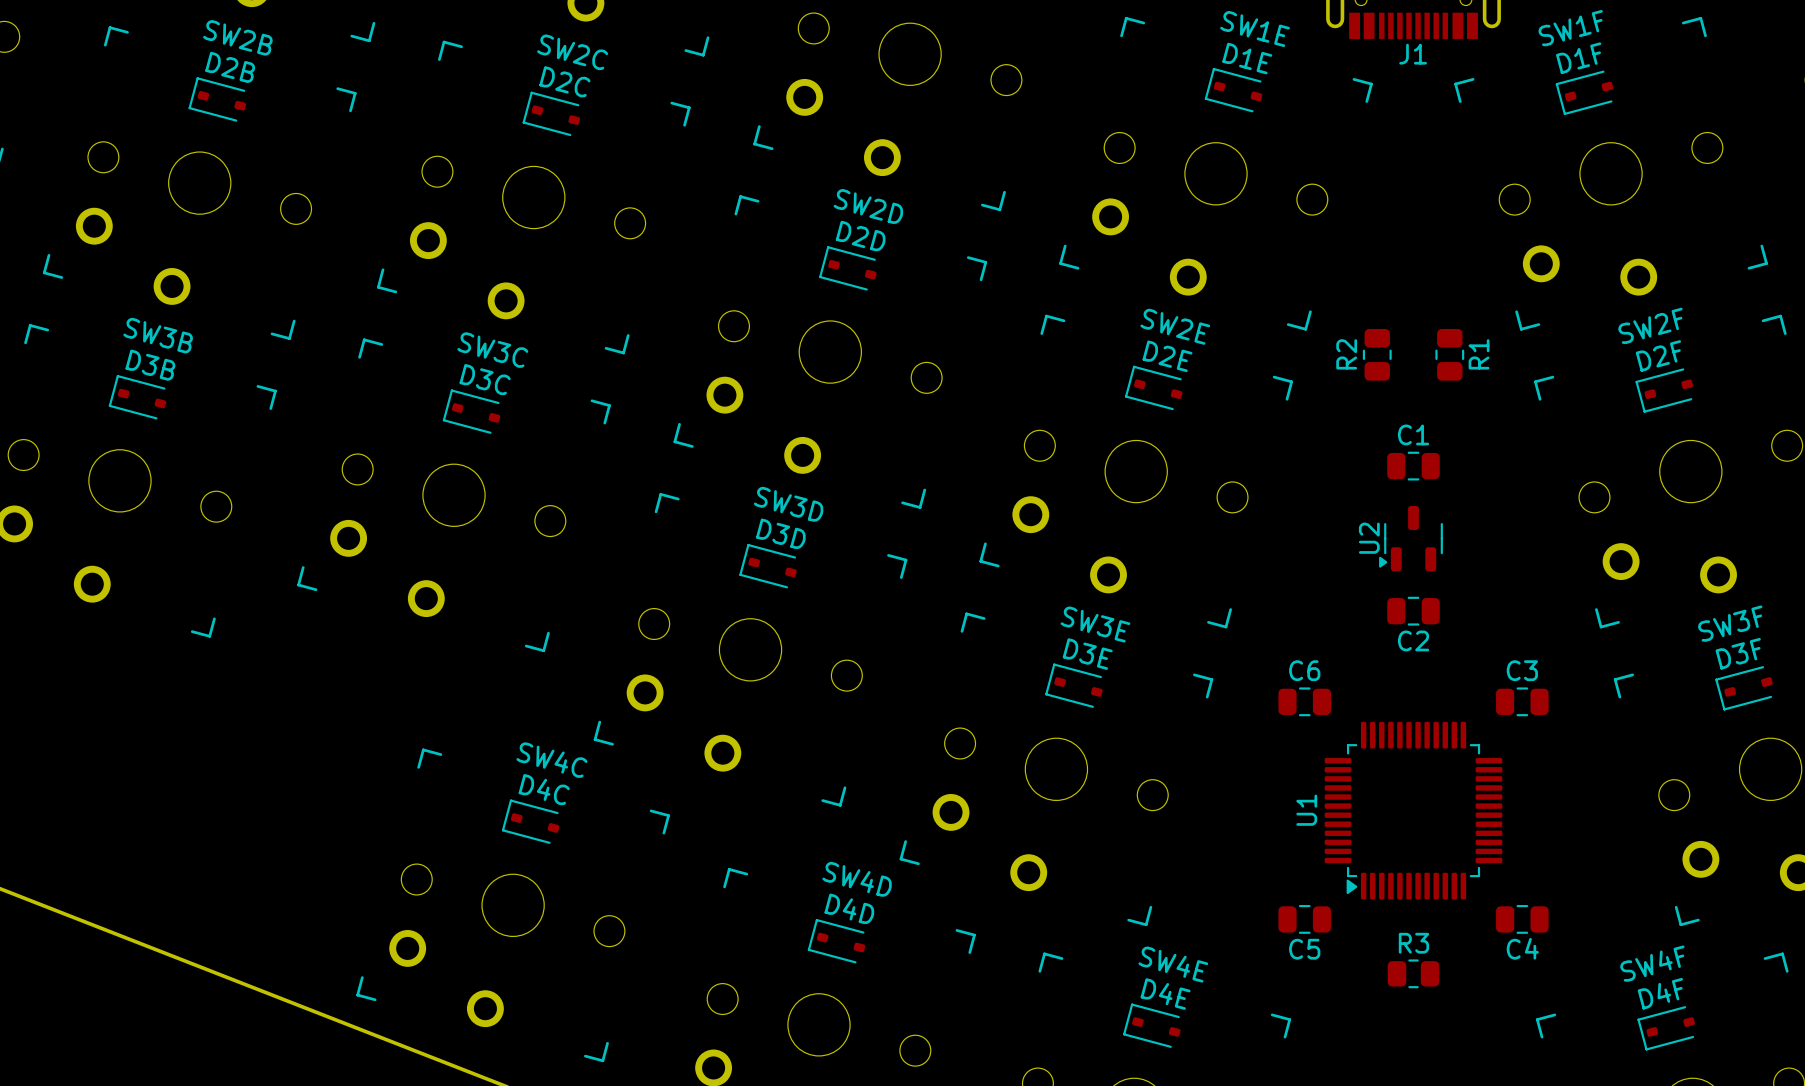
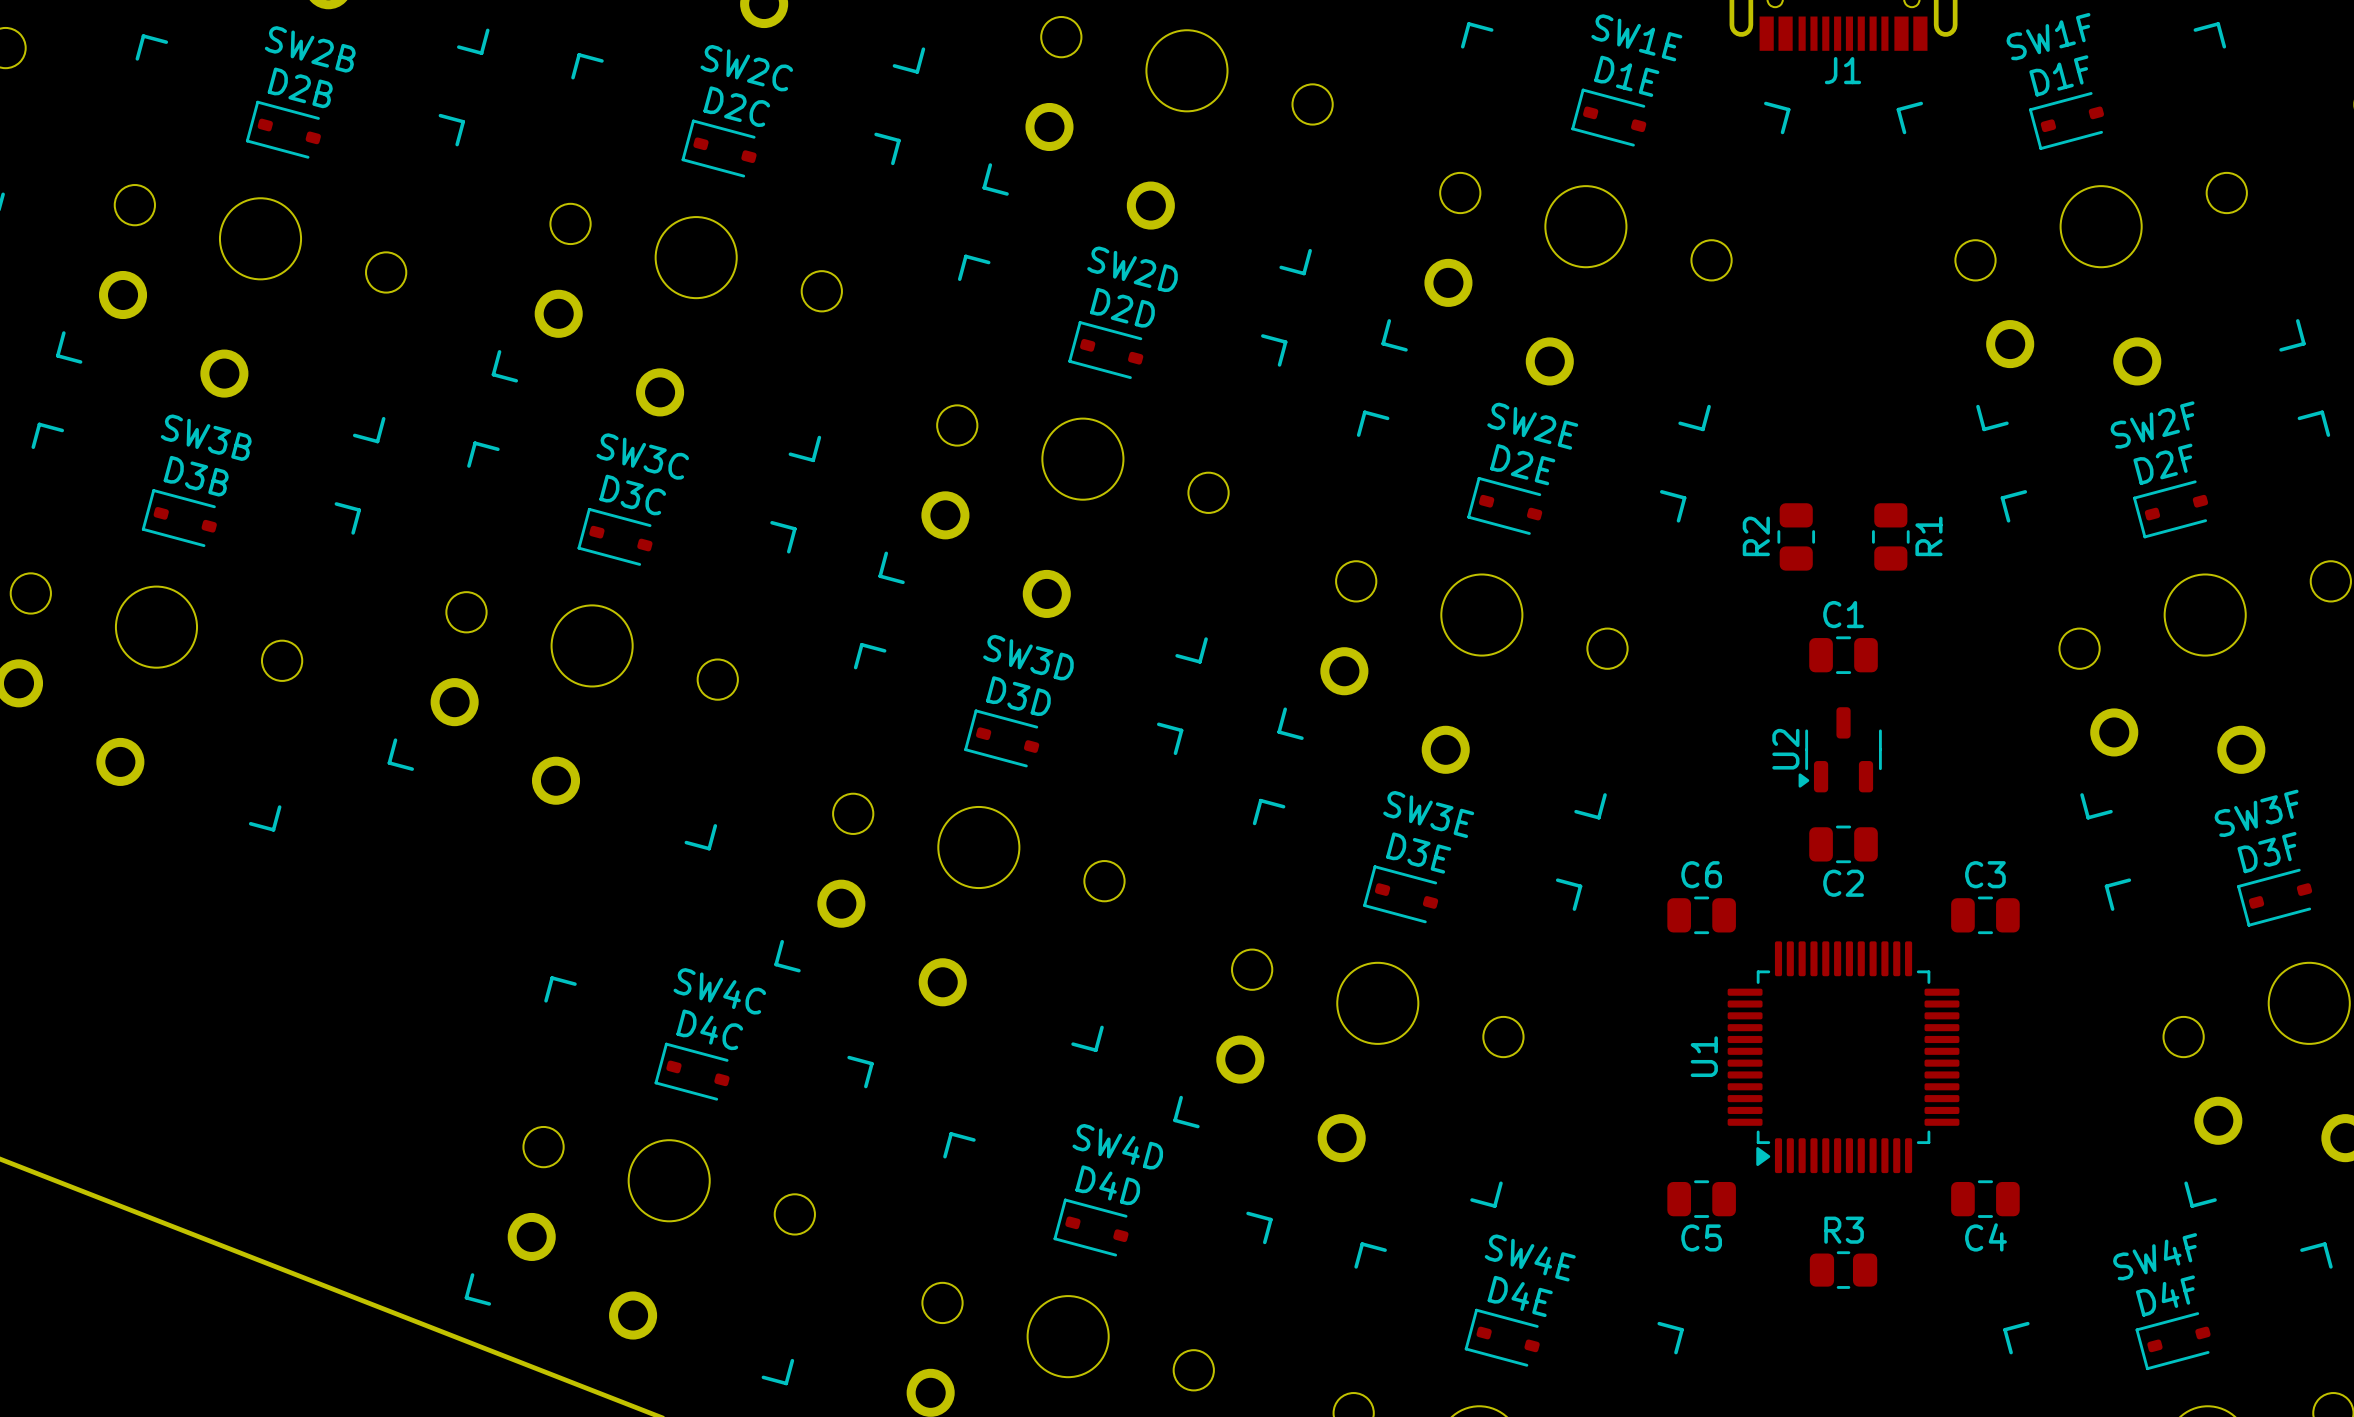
R2 position: (1377, 354) -> (1796, 536)
R1 position: (1449, 354) -> (1890, 536)
C1 position: (1413, 466) -> (1843, 655)
U2 position: (1410, 538) -> (1840, 749)
C2 position: (1413, 611) -> (1843, 844)

